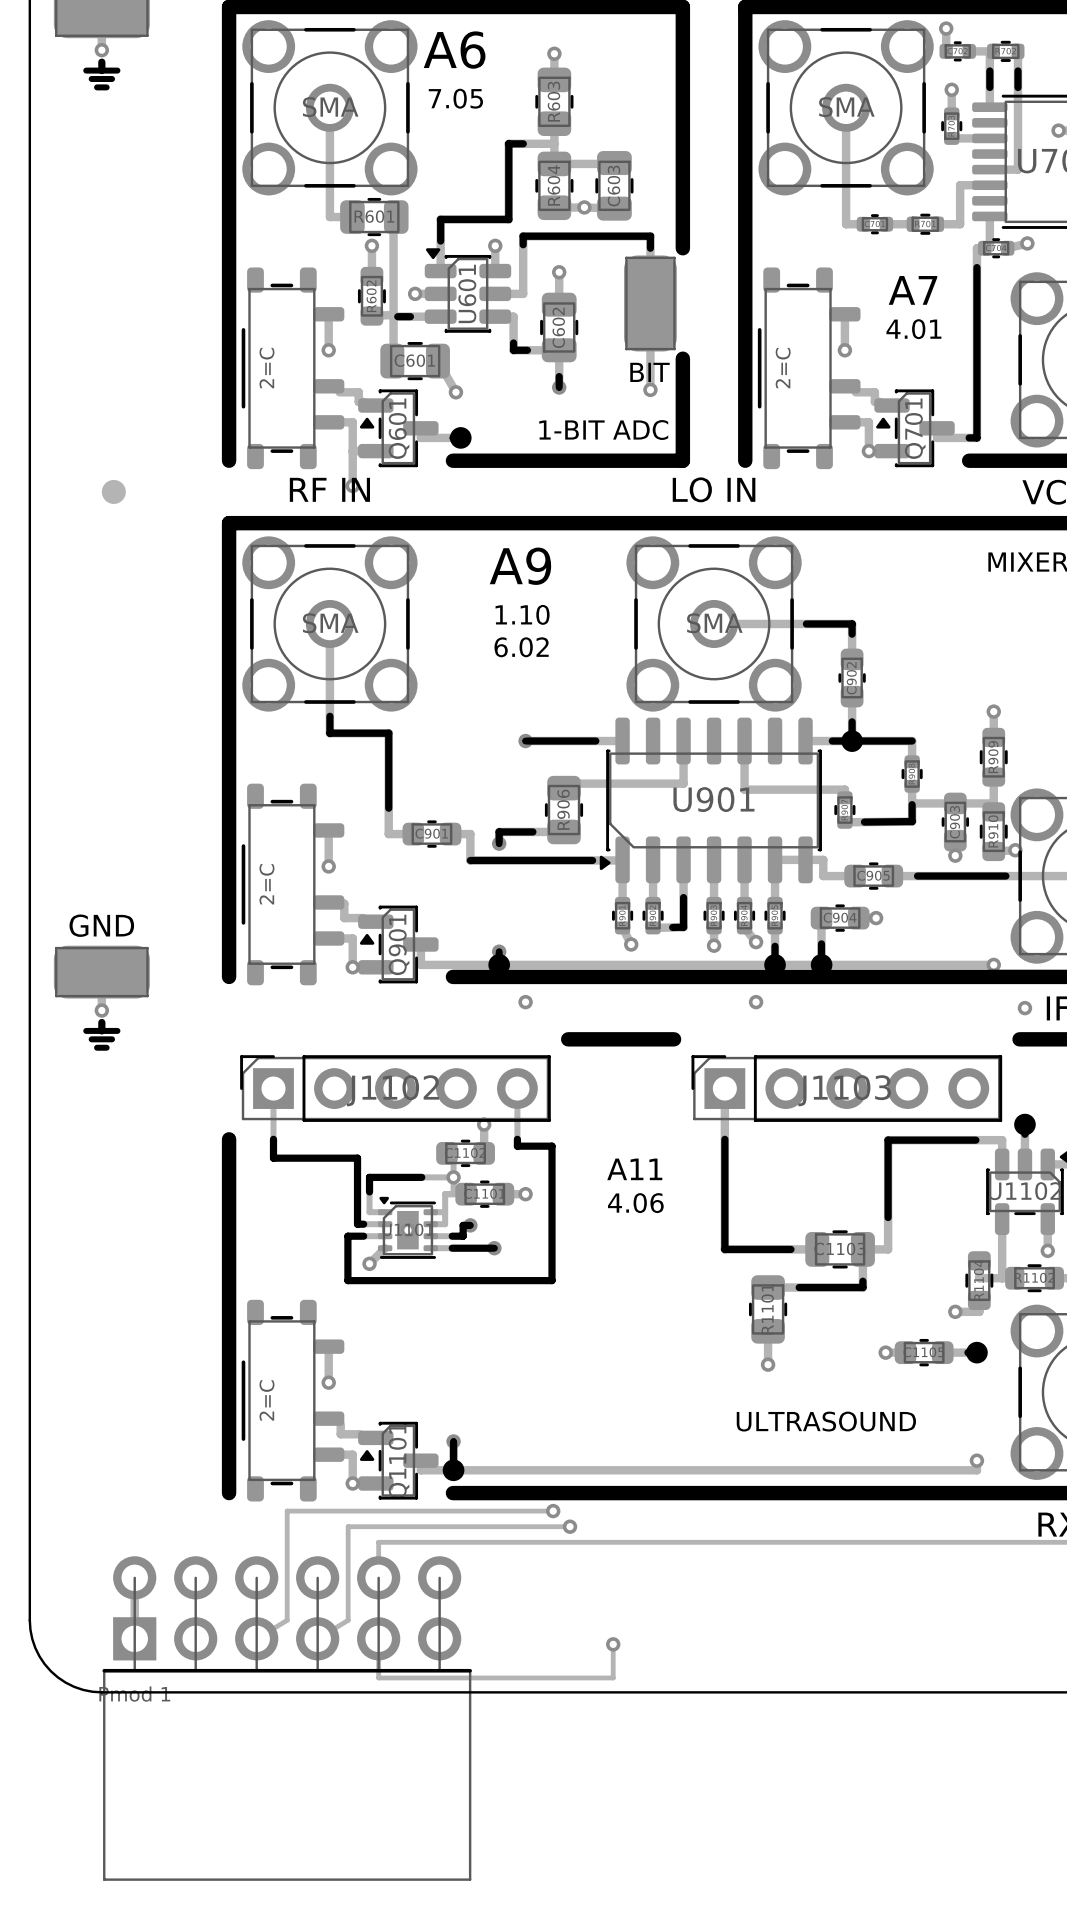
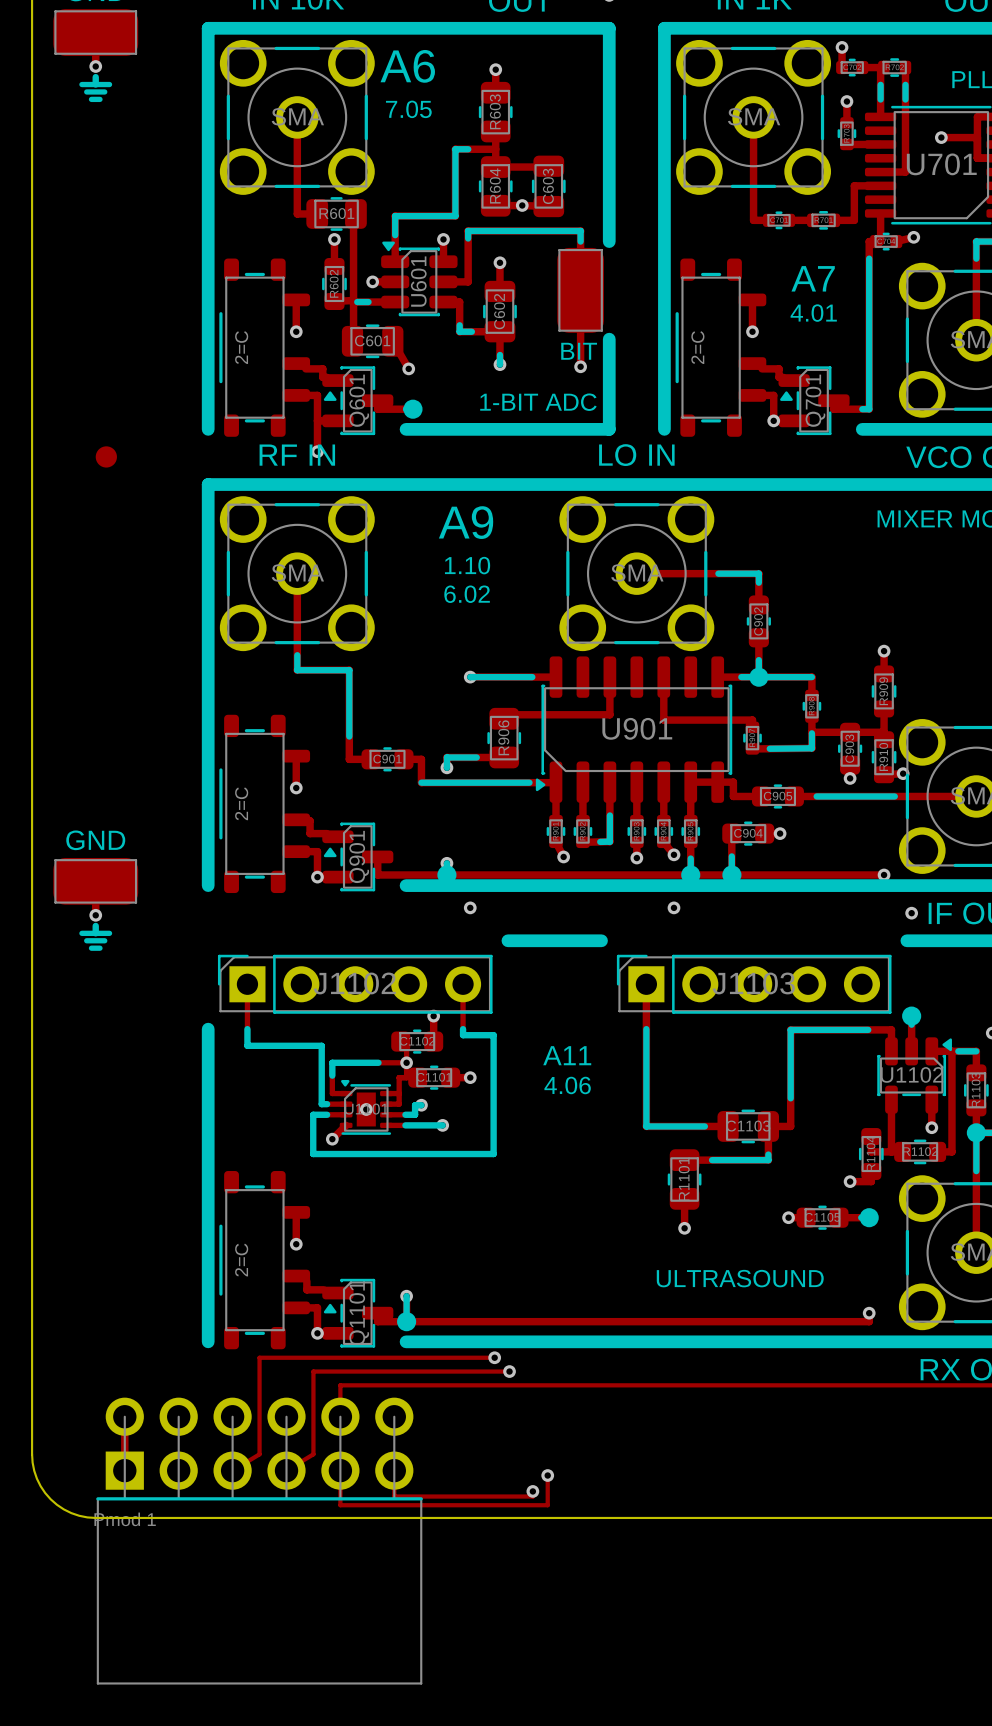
track: none -> (394, 1470) (394, 1496) (532, 1496) (532, 1491)
via: none -> (532, 1491)

